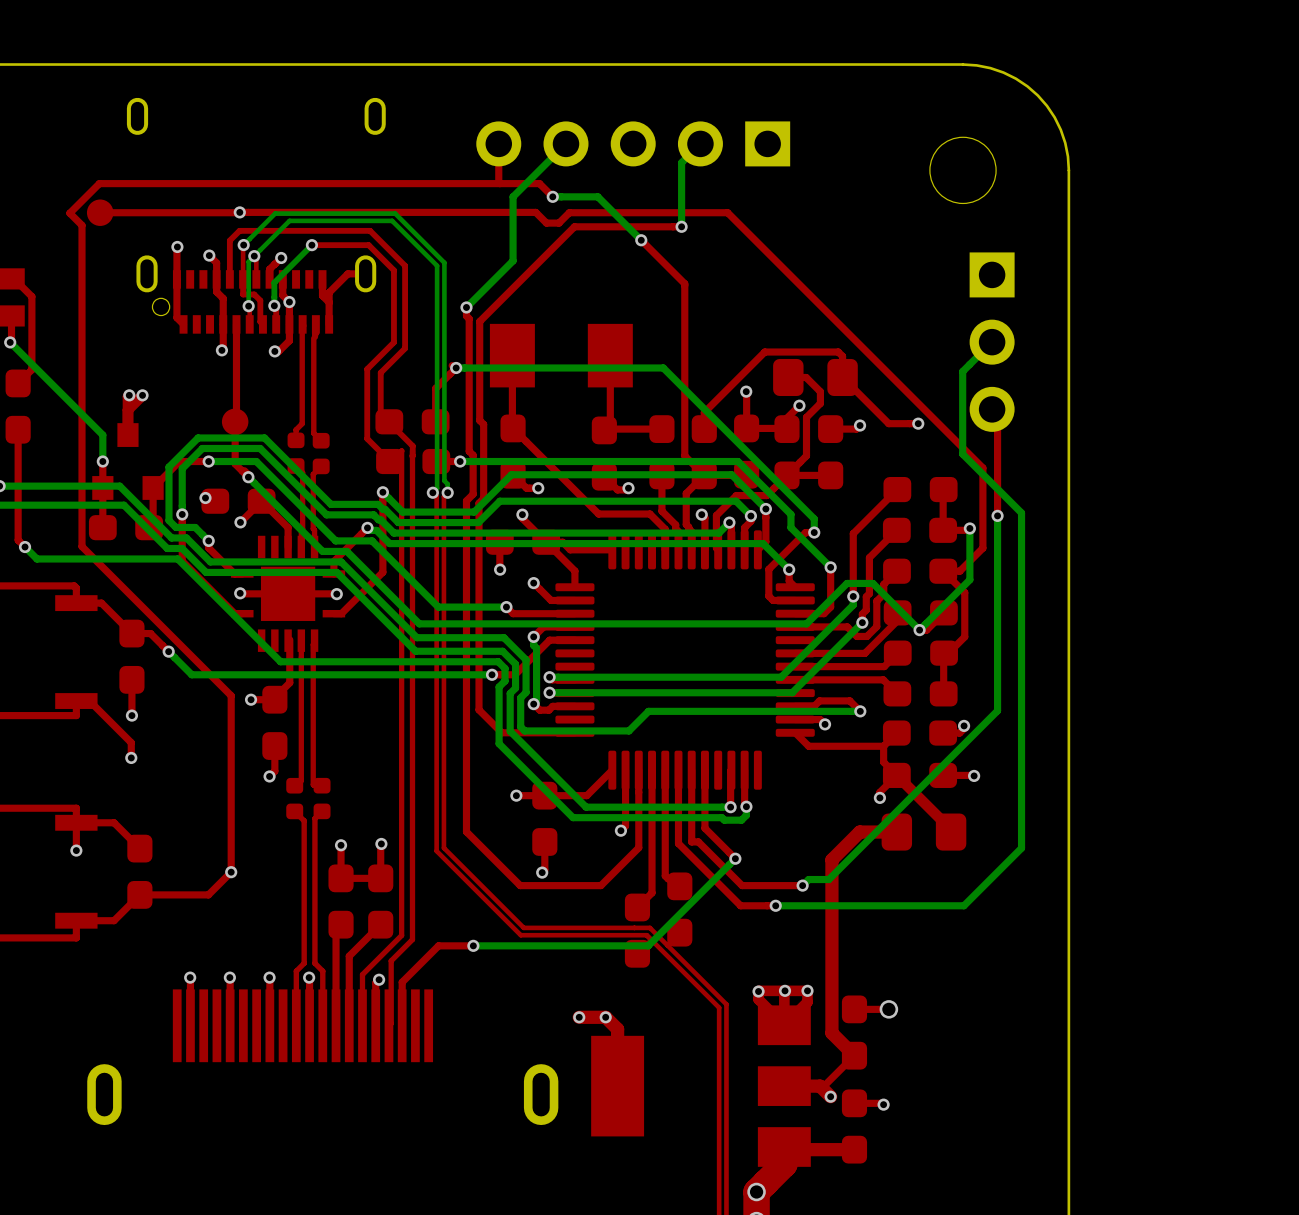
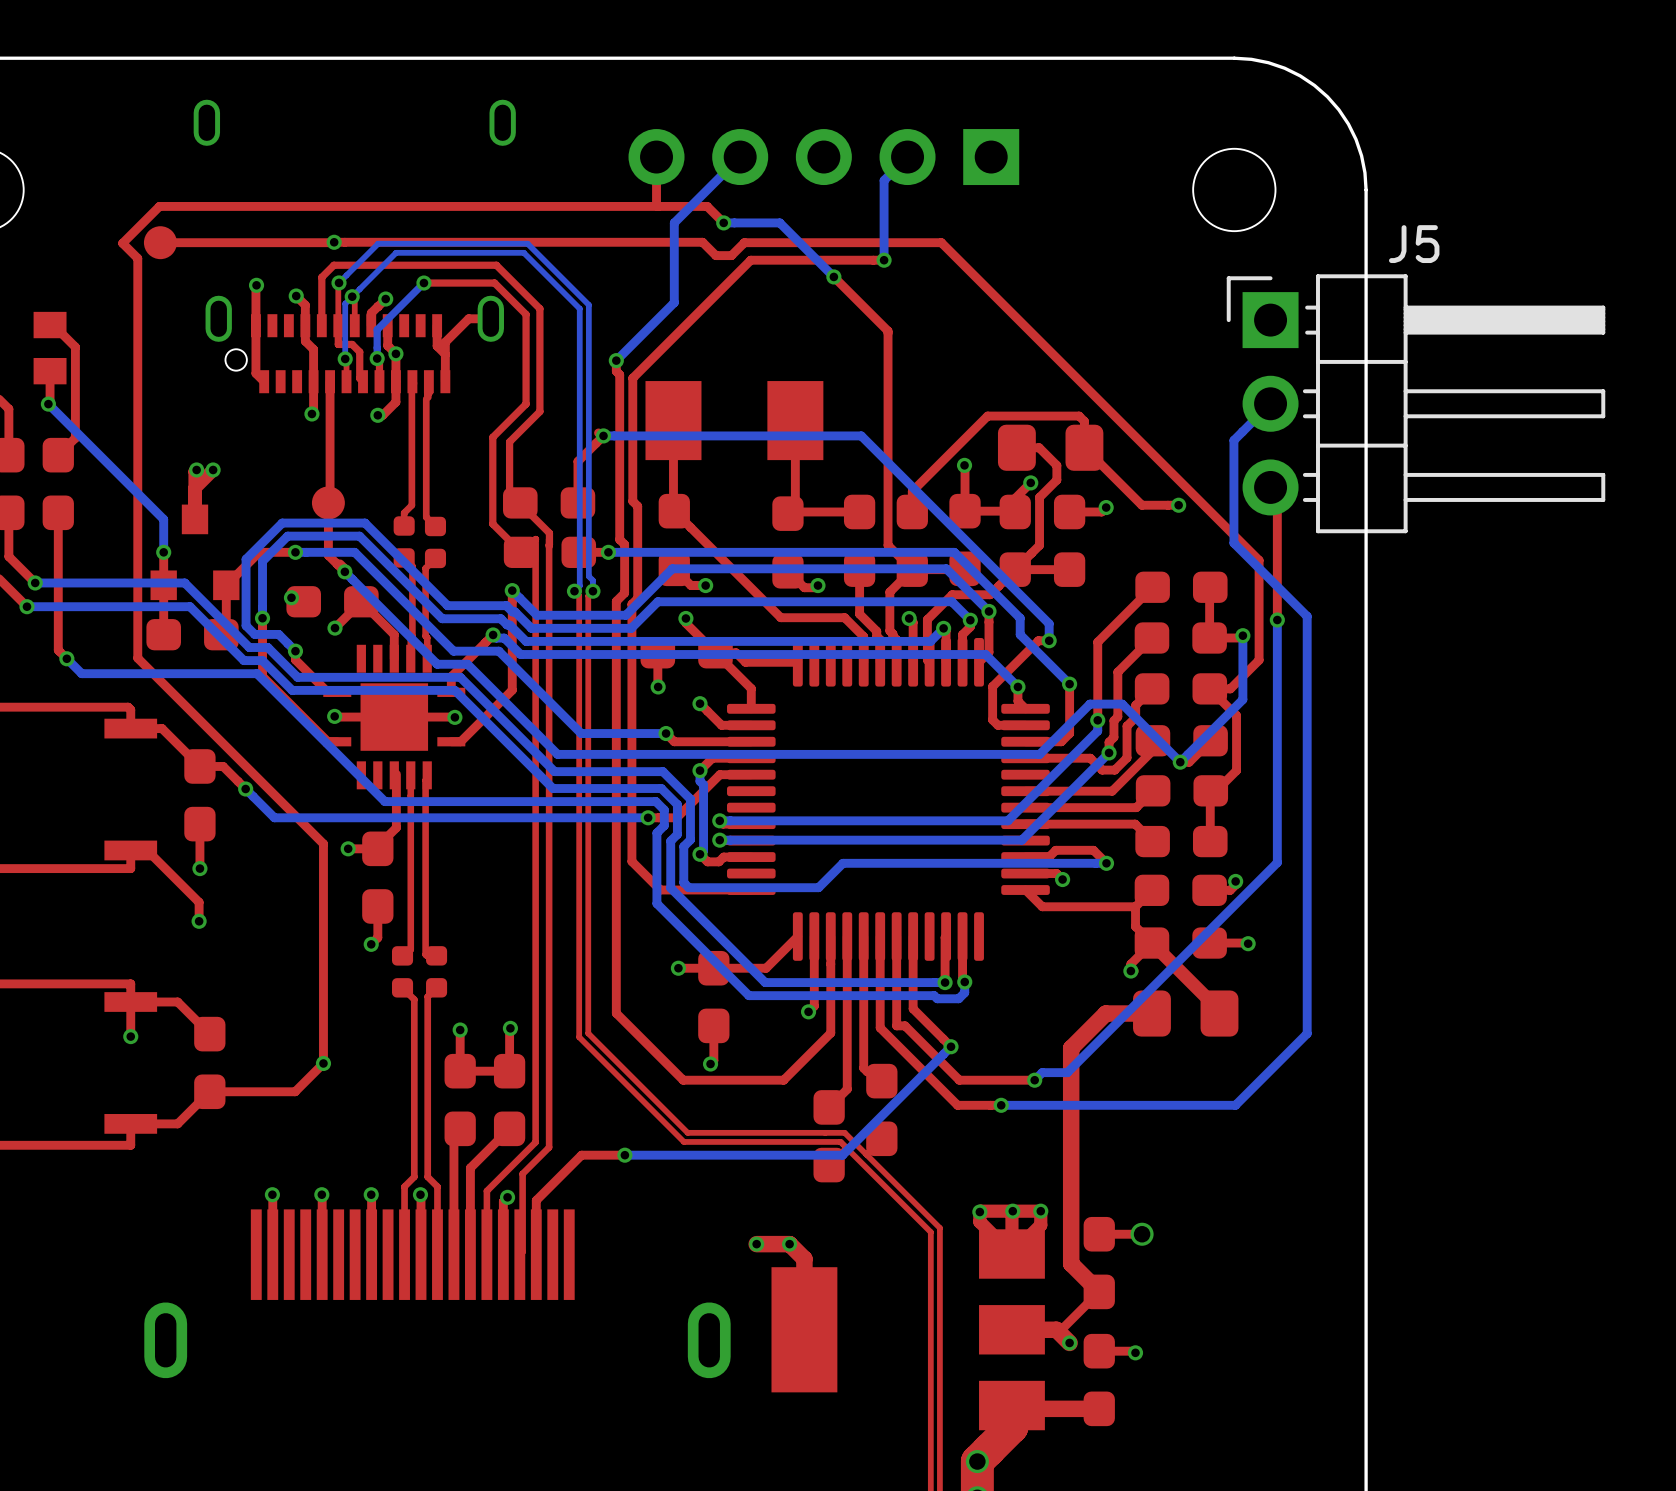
J5 side: top (992, 342) -> bottom (1416, 403)

